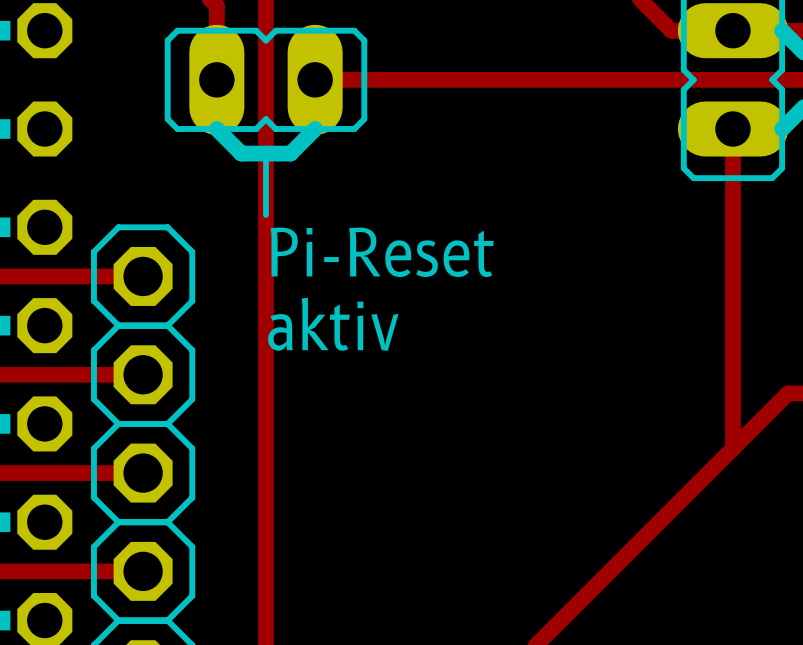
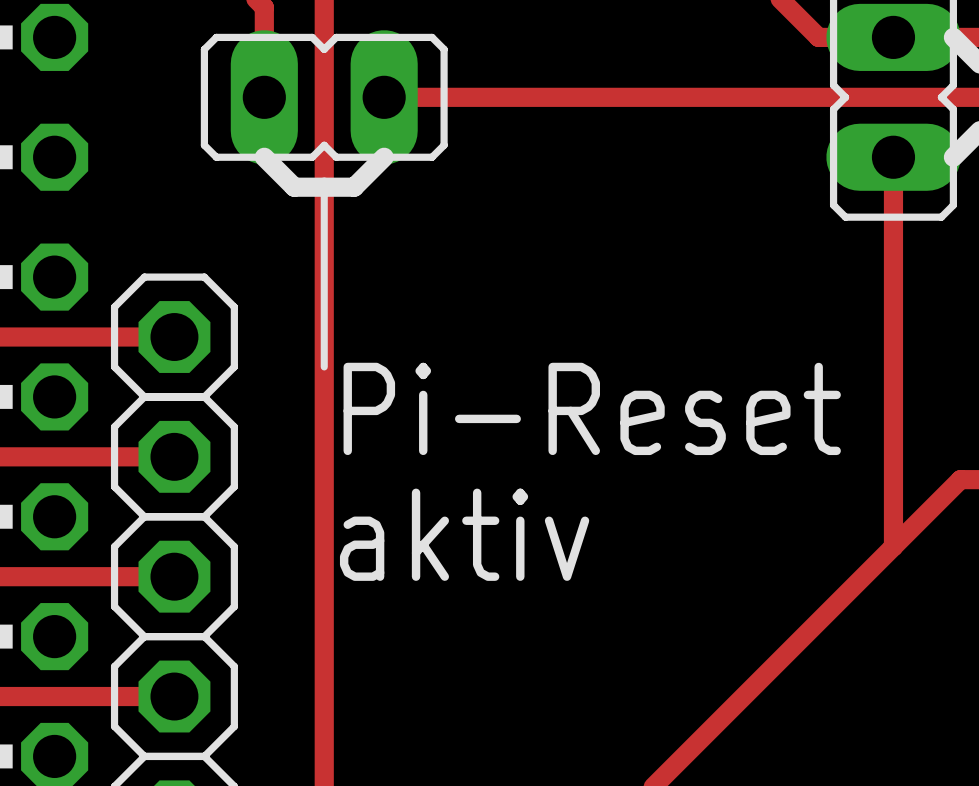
line: none -> (324, 262) (324, 366)
text: Pi-Reset (382, 252) -> none
text: aktiv (333, 324) -> Pi-Reset (592, 408)
text: none -> aktiv (464, 534)

